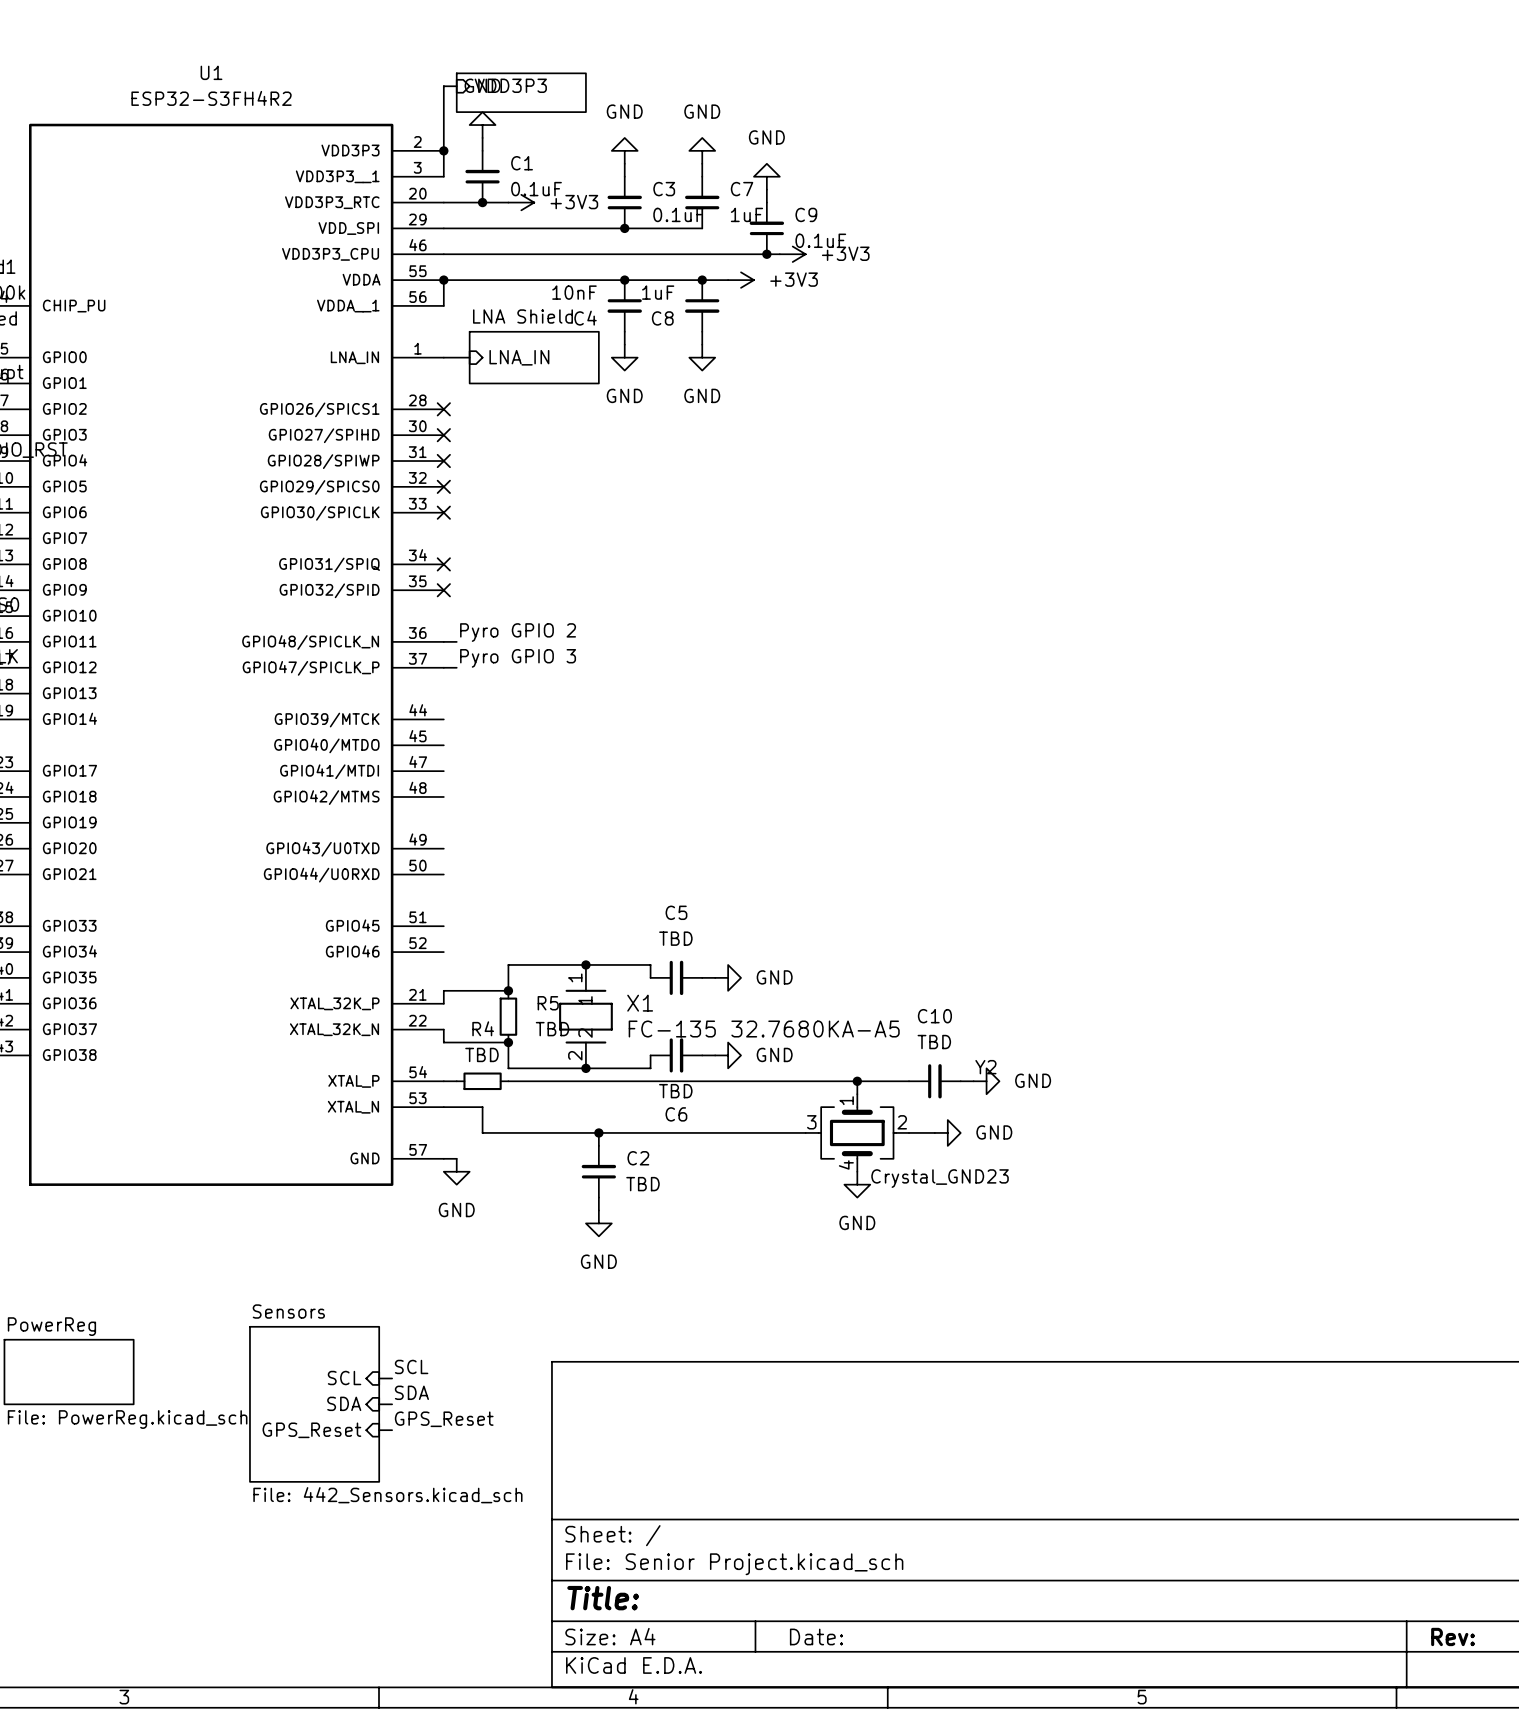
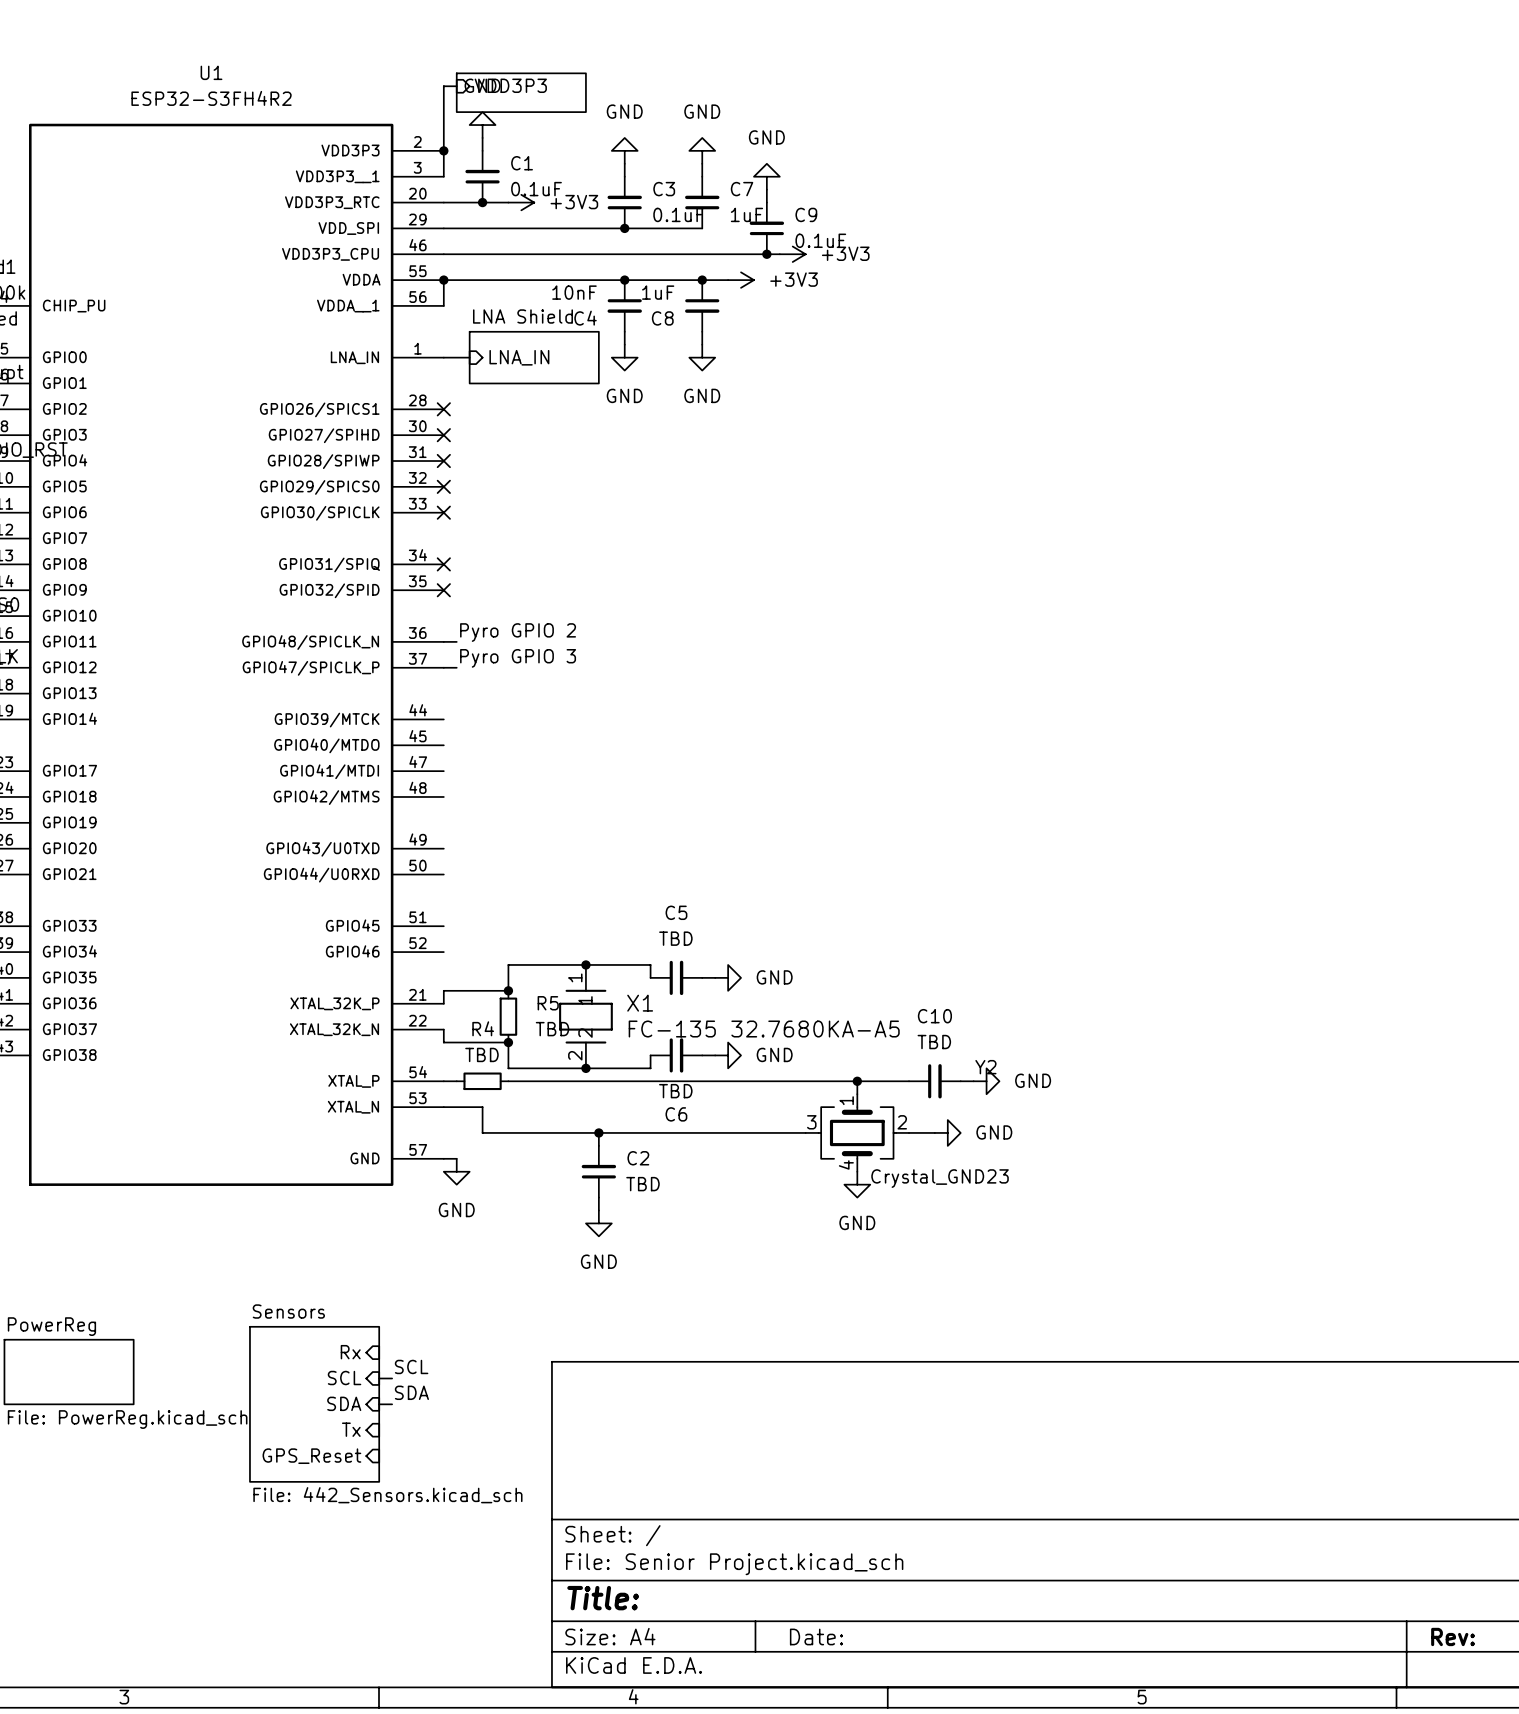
sheet pin: none -> Rx (350, 1352)
label: GPS_Reset (444, 1419) -> none
sheet pin: GPS_Reset (311, 1430) -> Tx (351, 1429)
wire: (379, 1430) (392, 1430) -> none
sheet pin: none -> GPS_Reset (311, 1456)

